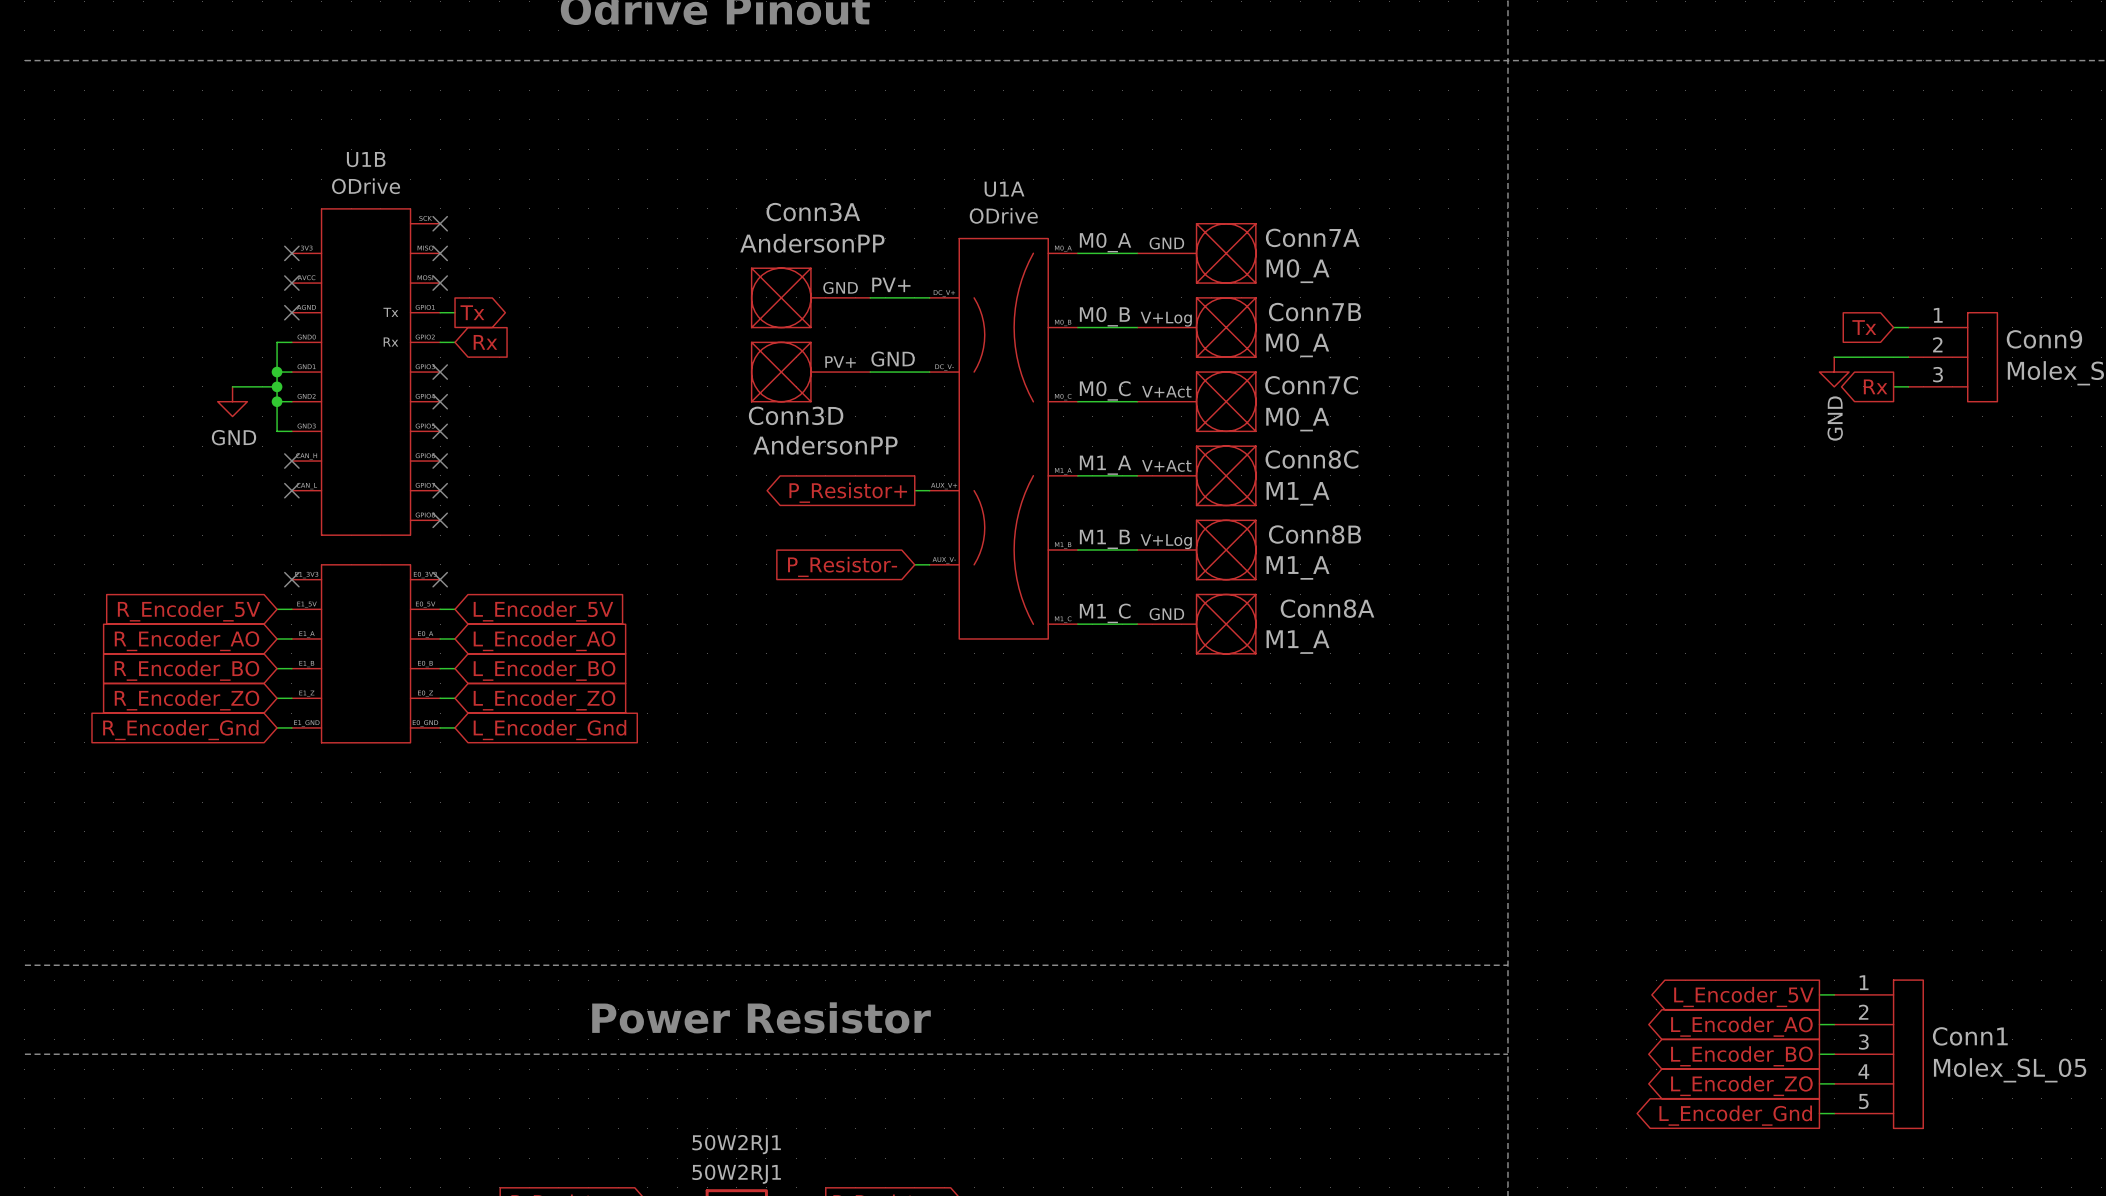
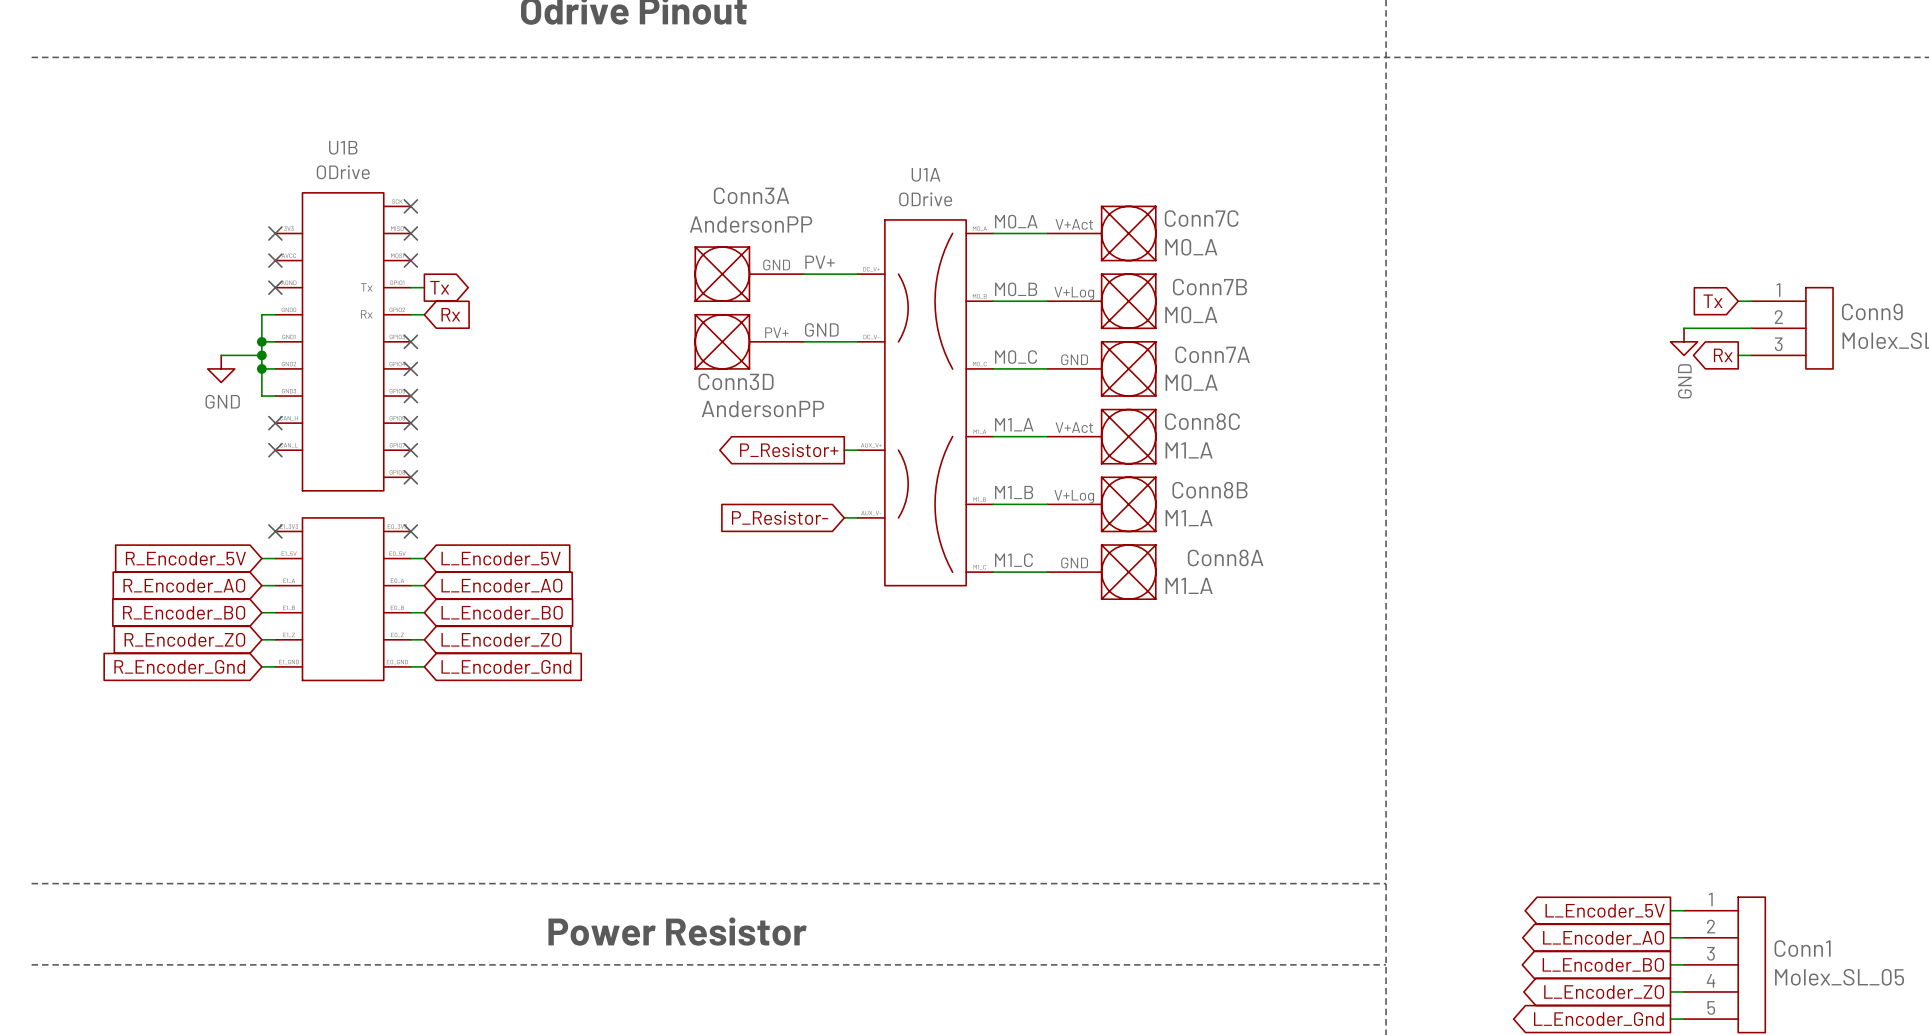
Conn7A position: (1196, 253) -> (1101, 368)
Conn7C position: (1196, 401) -> (1101, 233)

